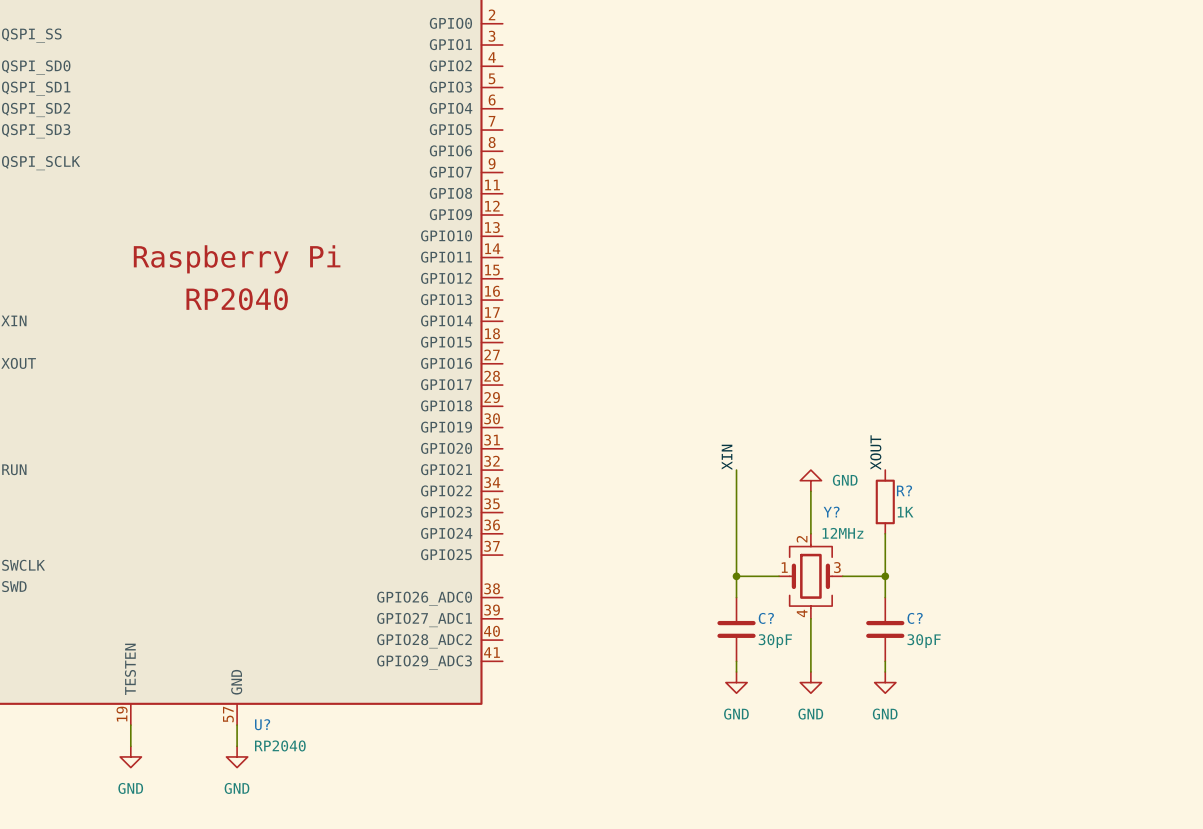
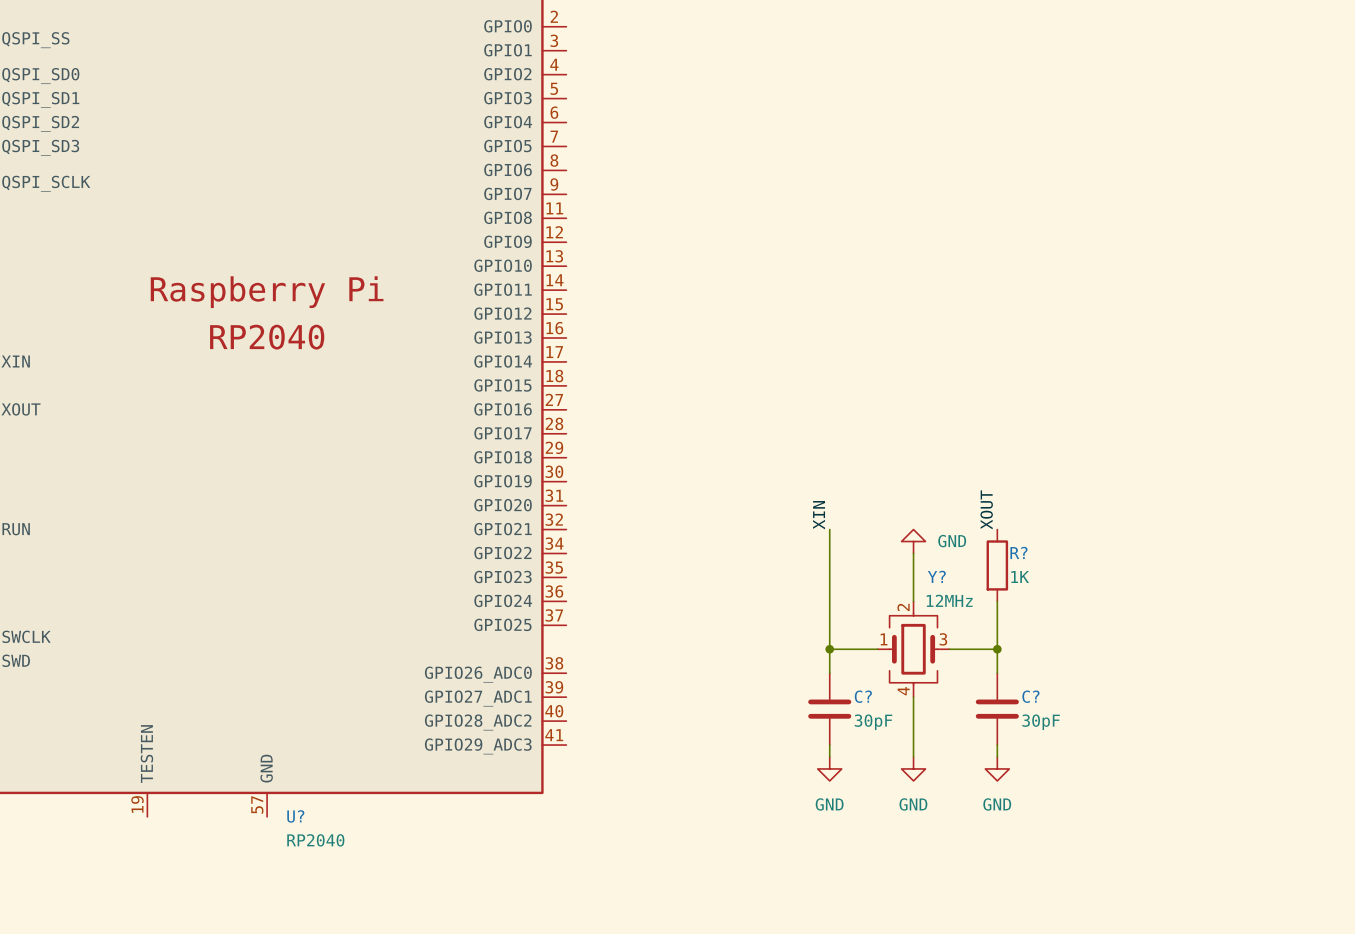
wire: (130, 725) (130, 746) -> none
wire: (237, 725) (237, 746) -> none
power symbol: GND (130, 756) -> none
power symbol: GND (237, 756) -> none

